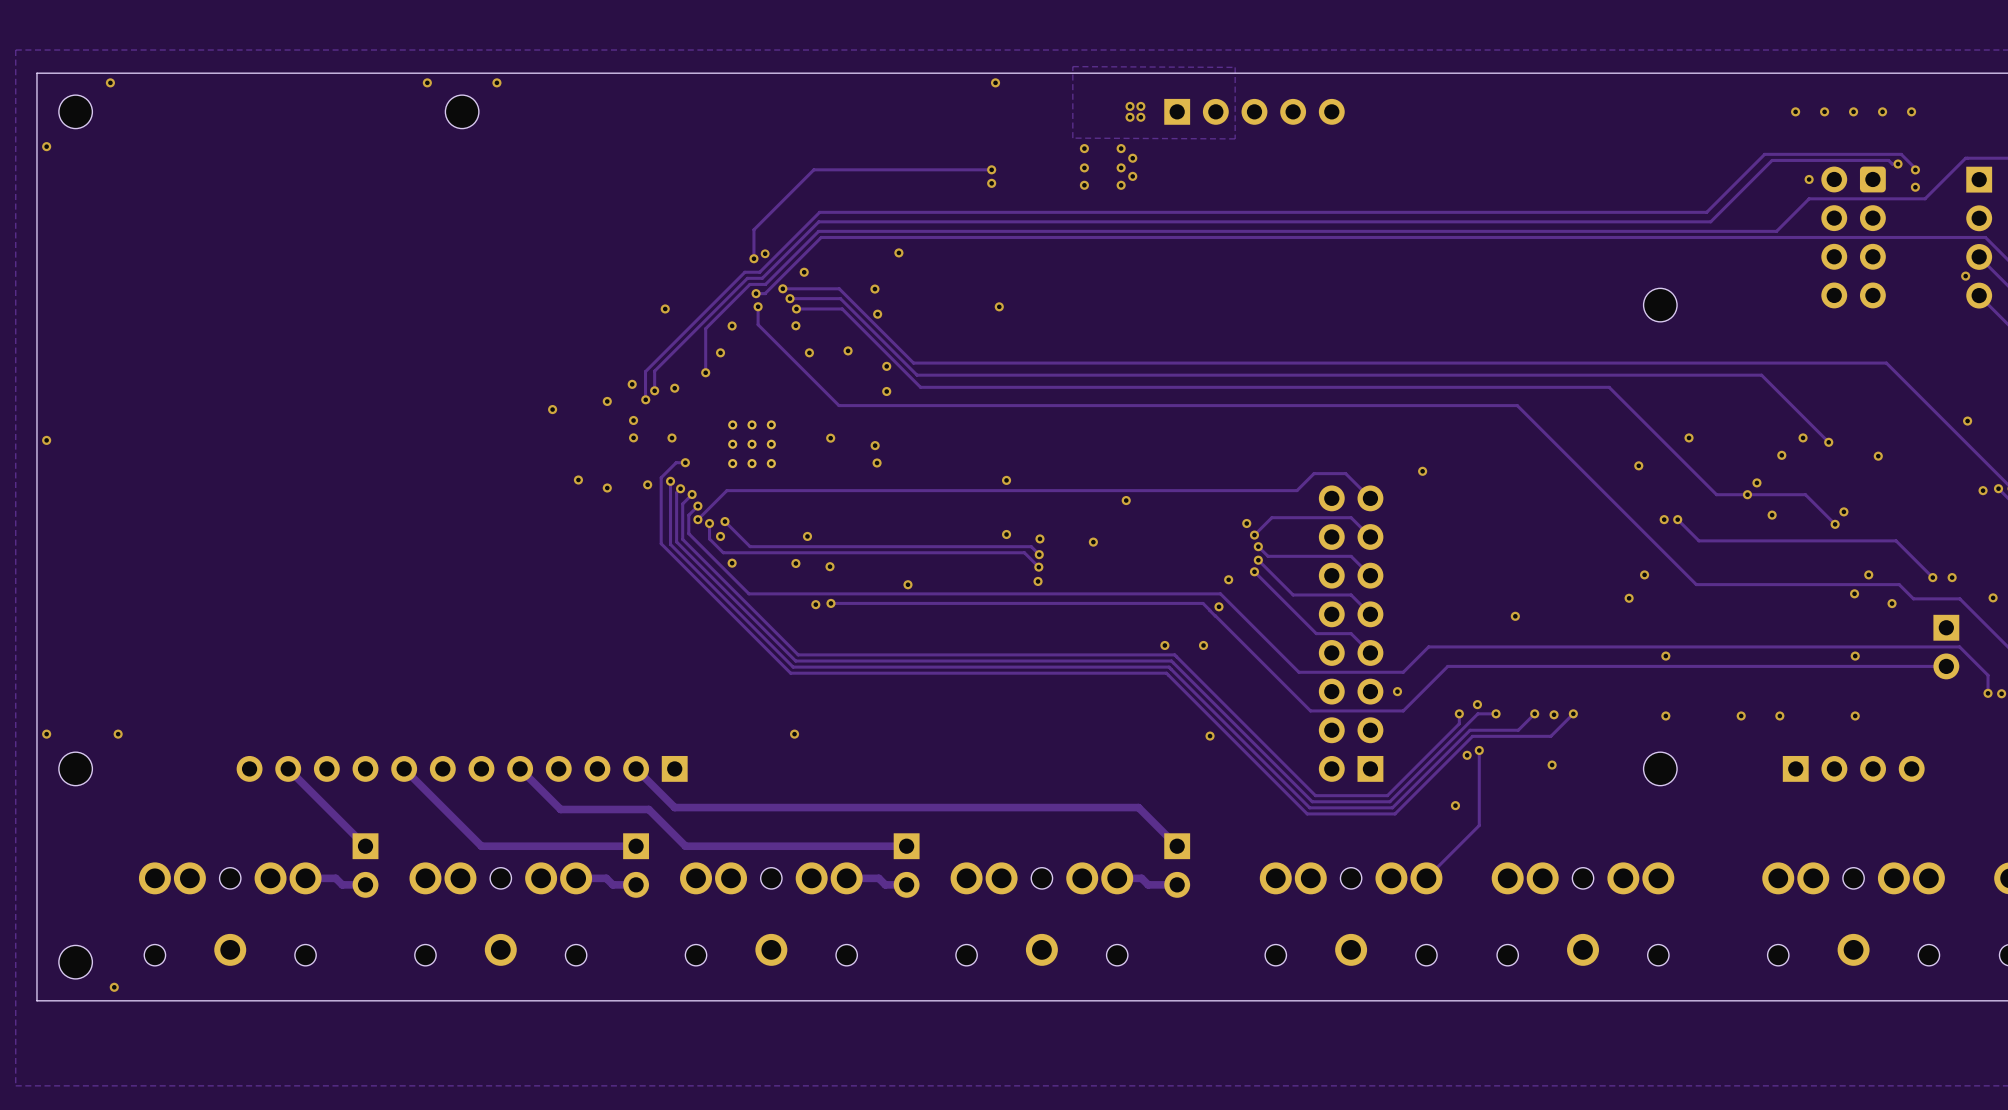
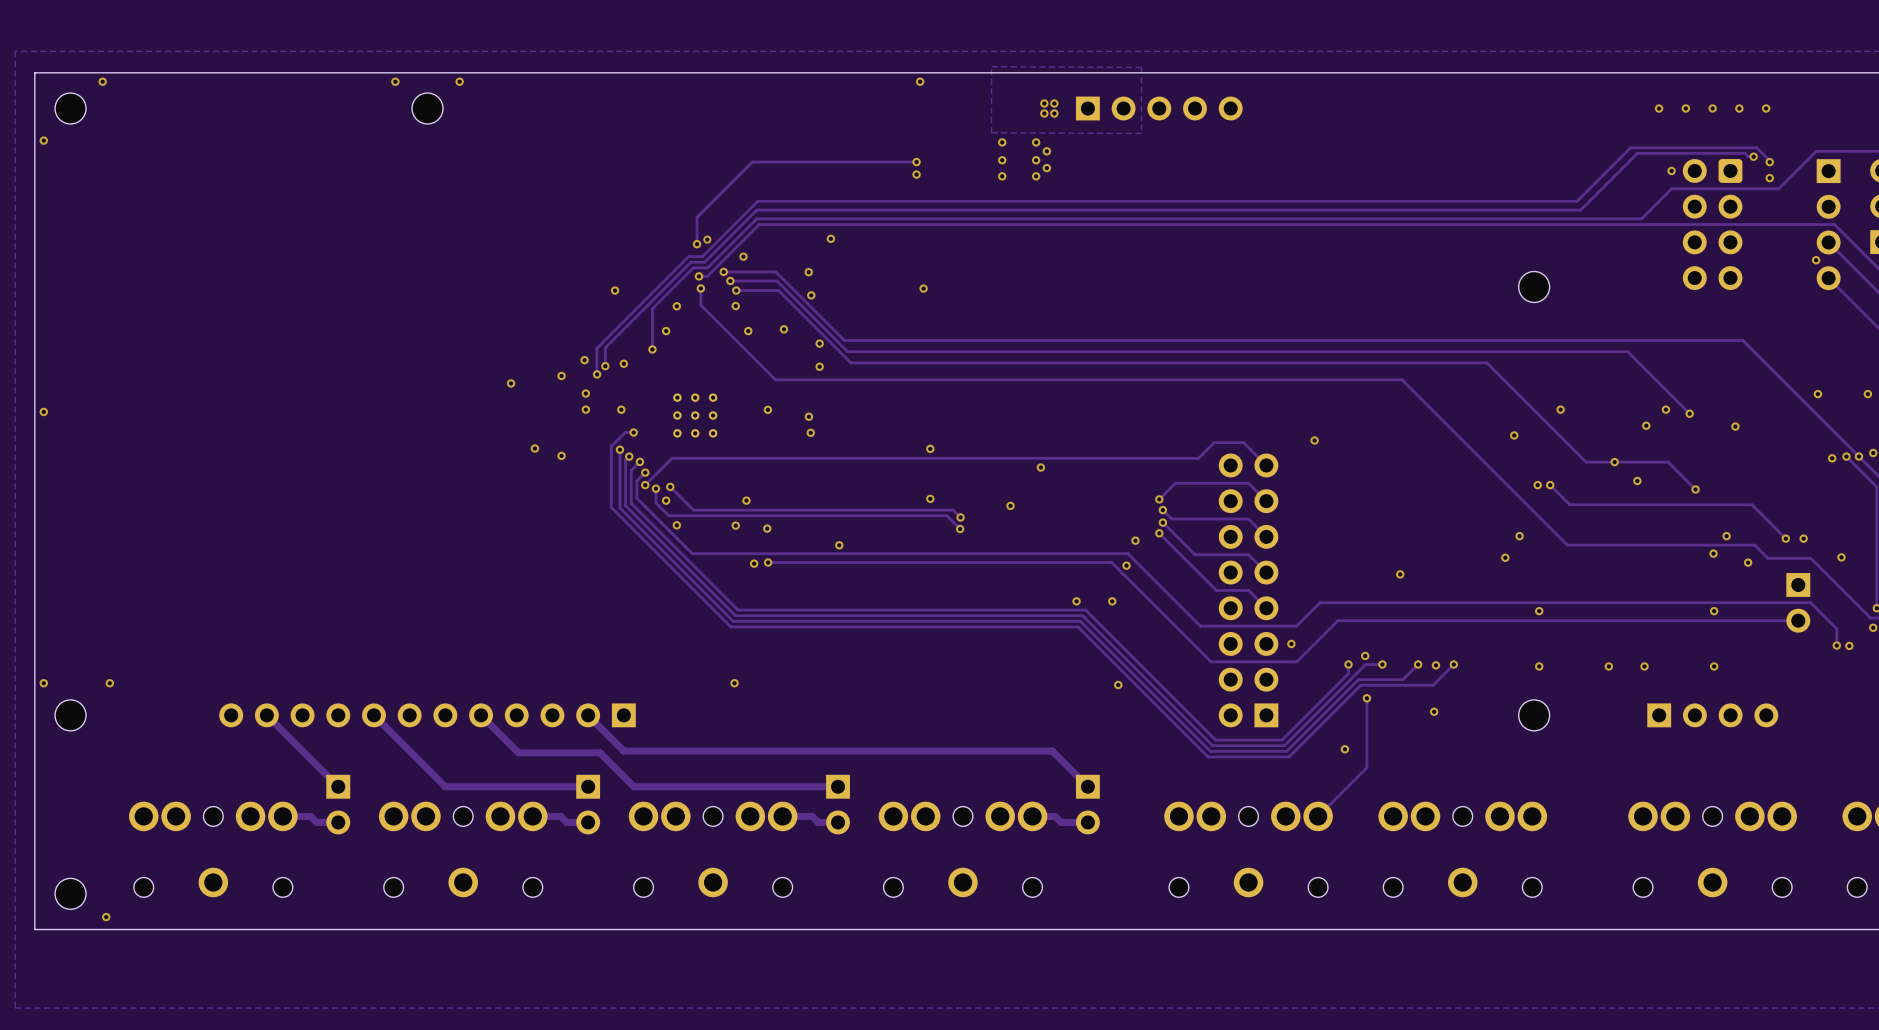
via: (1756, 482) -> none
via: (647, 484) -> none
via: (1843, 511) -> none
via: (1246, 523) -> none
via: (1039, 538) -> none
via: (1038, 581) -> none
via: (1467, 755) -> none

